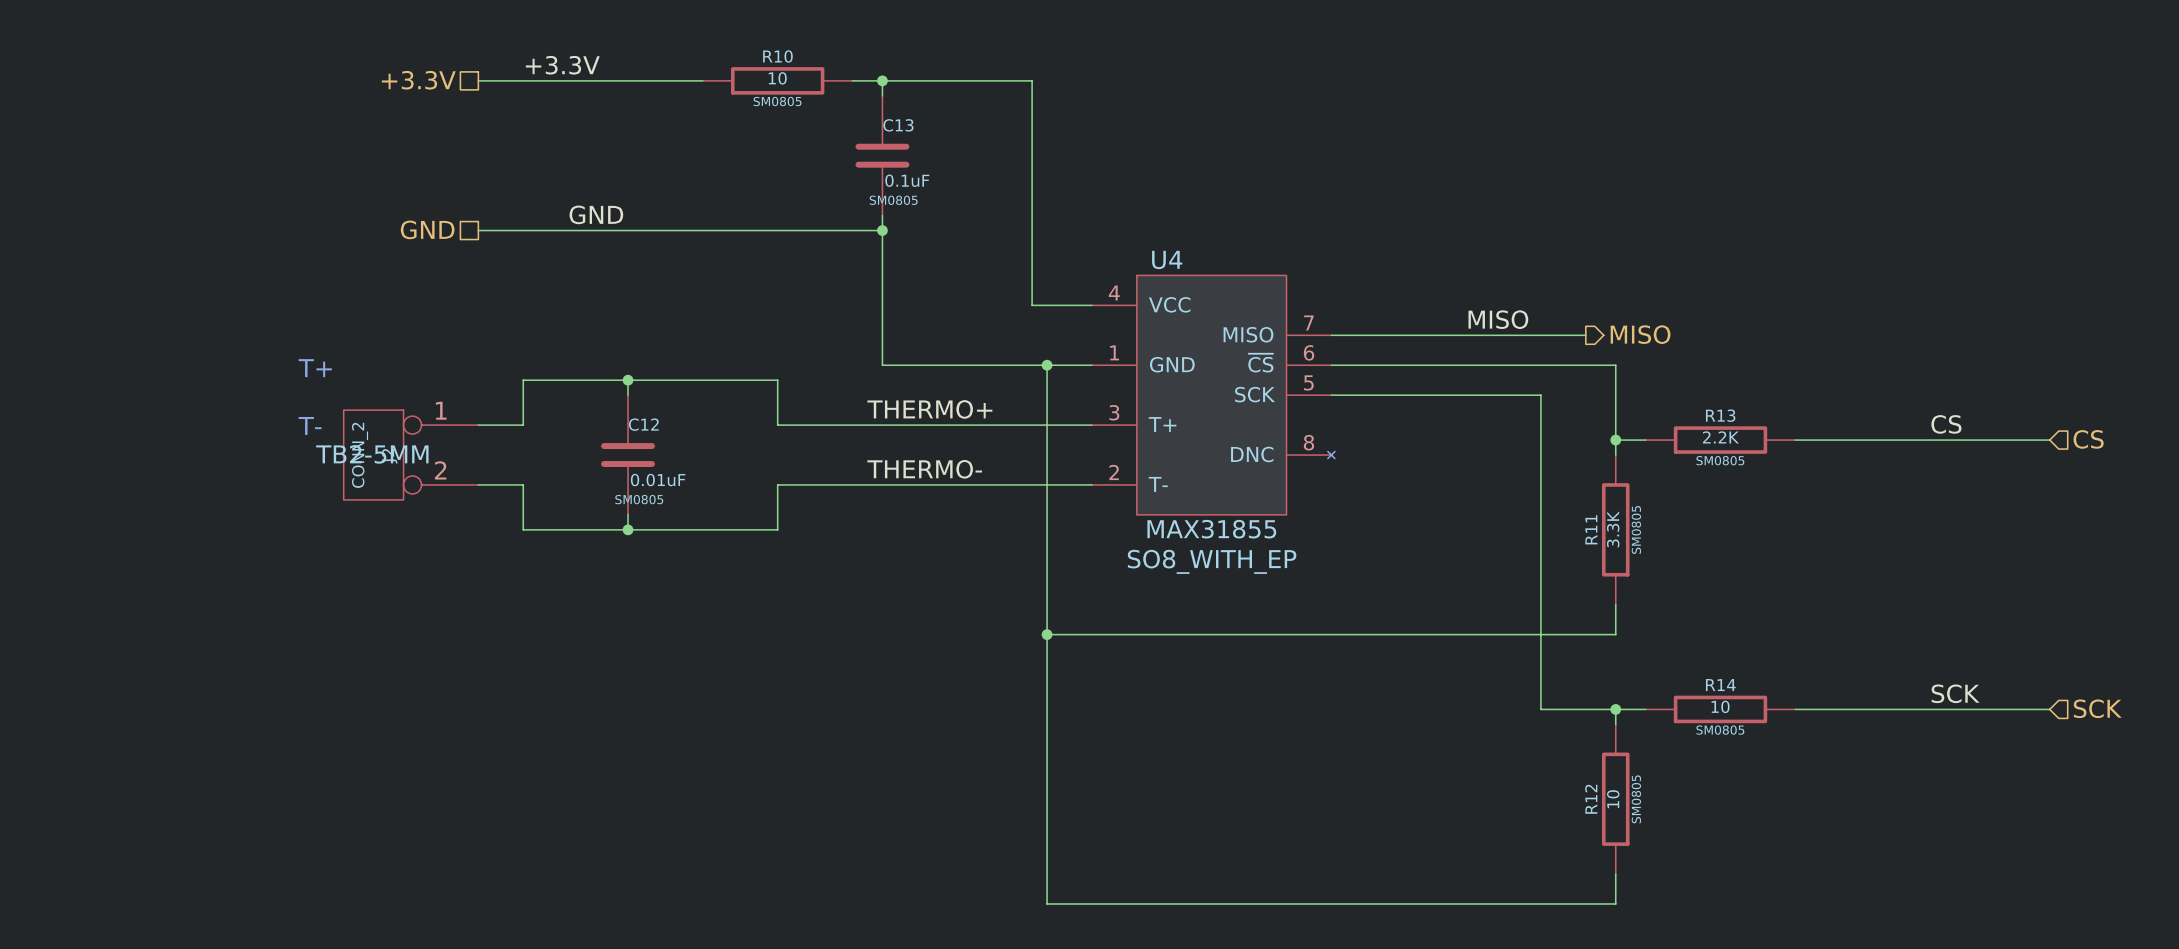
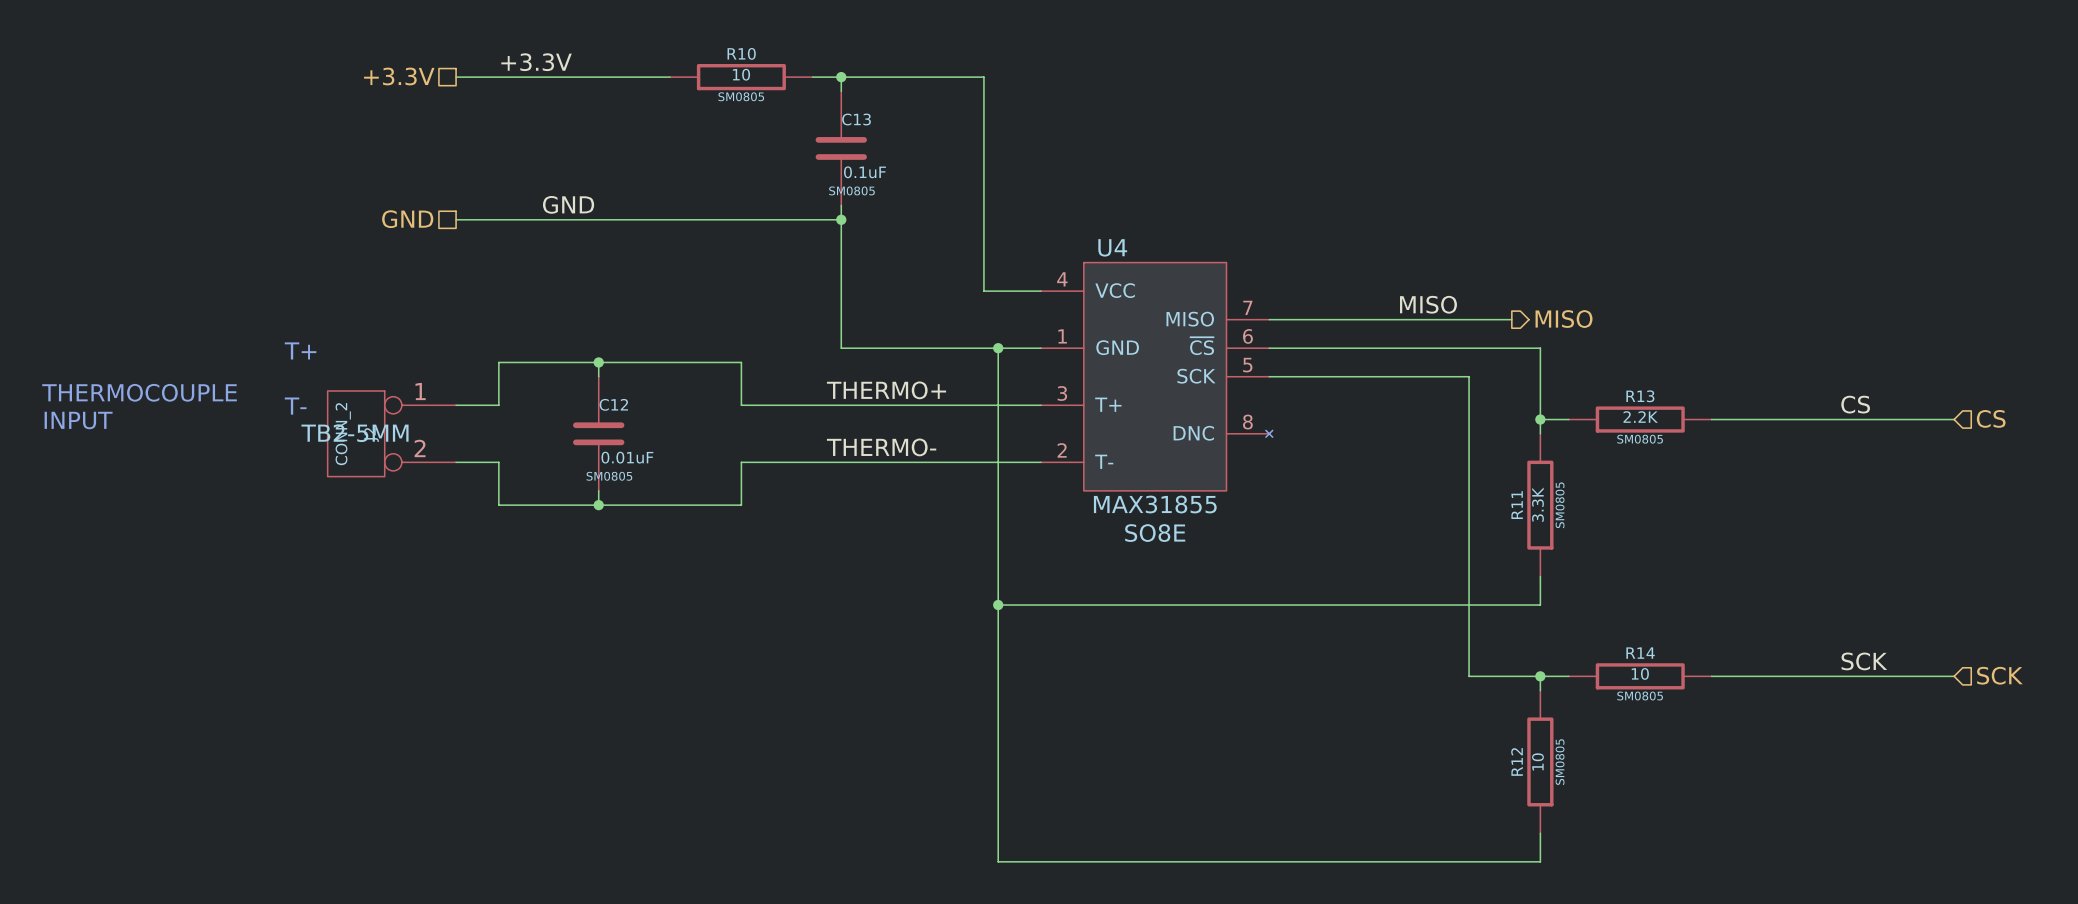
text: none -> THERMOCOUPLE (139, 392)
text: none -> INPUT (78, 420)
U4 text: SO8_WITH_EP (1212, 561) -> SO8E (1155, 533)

